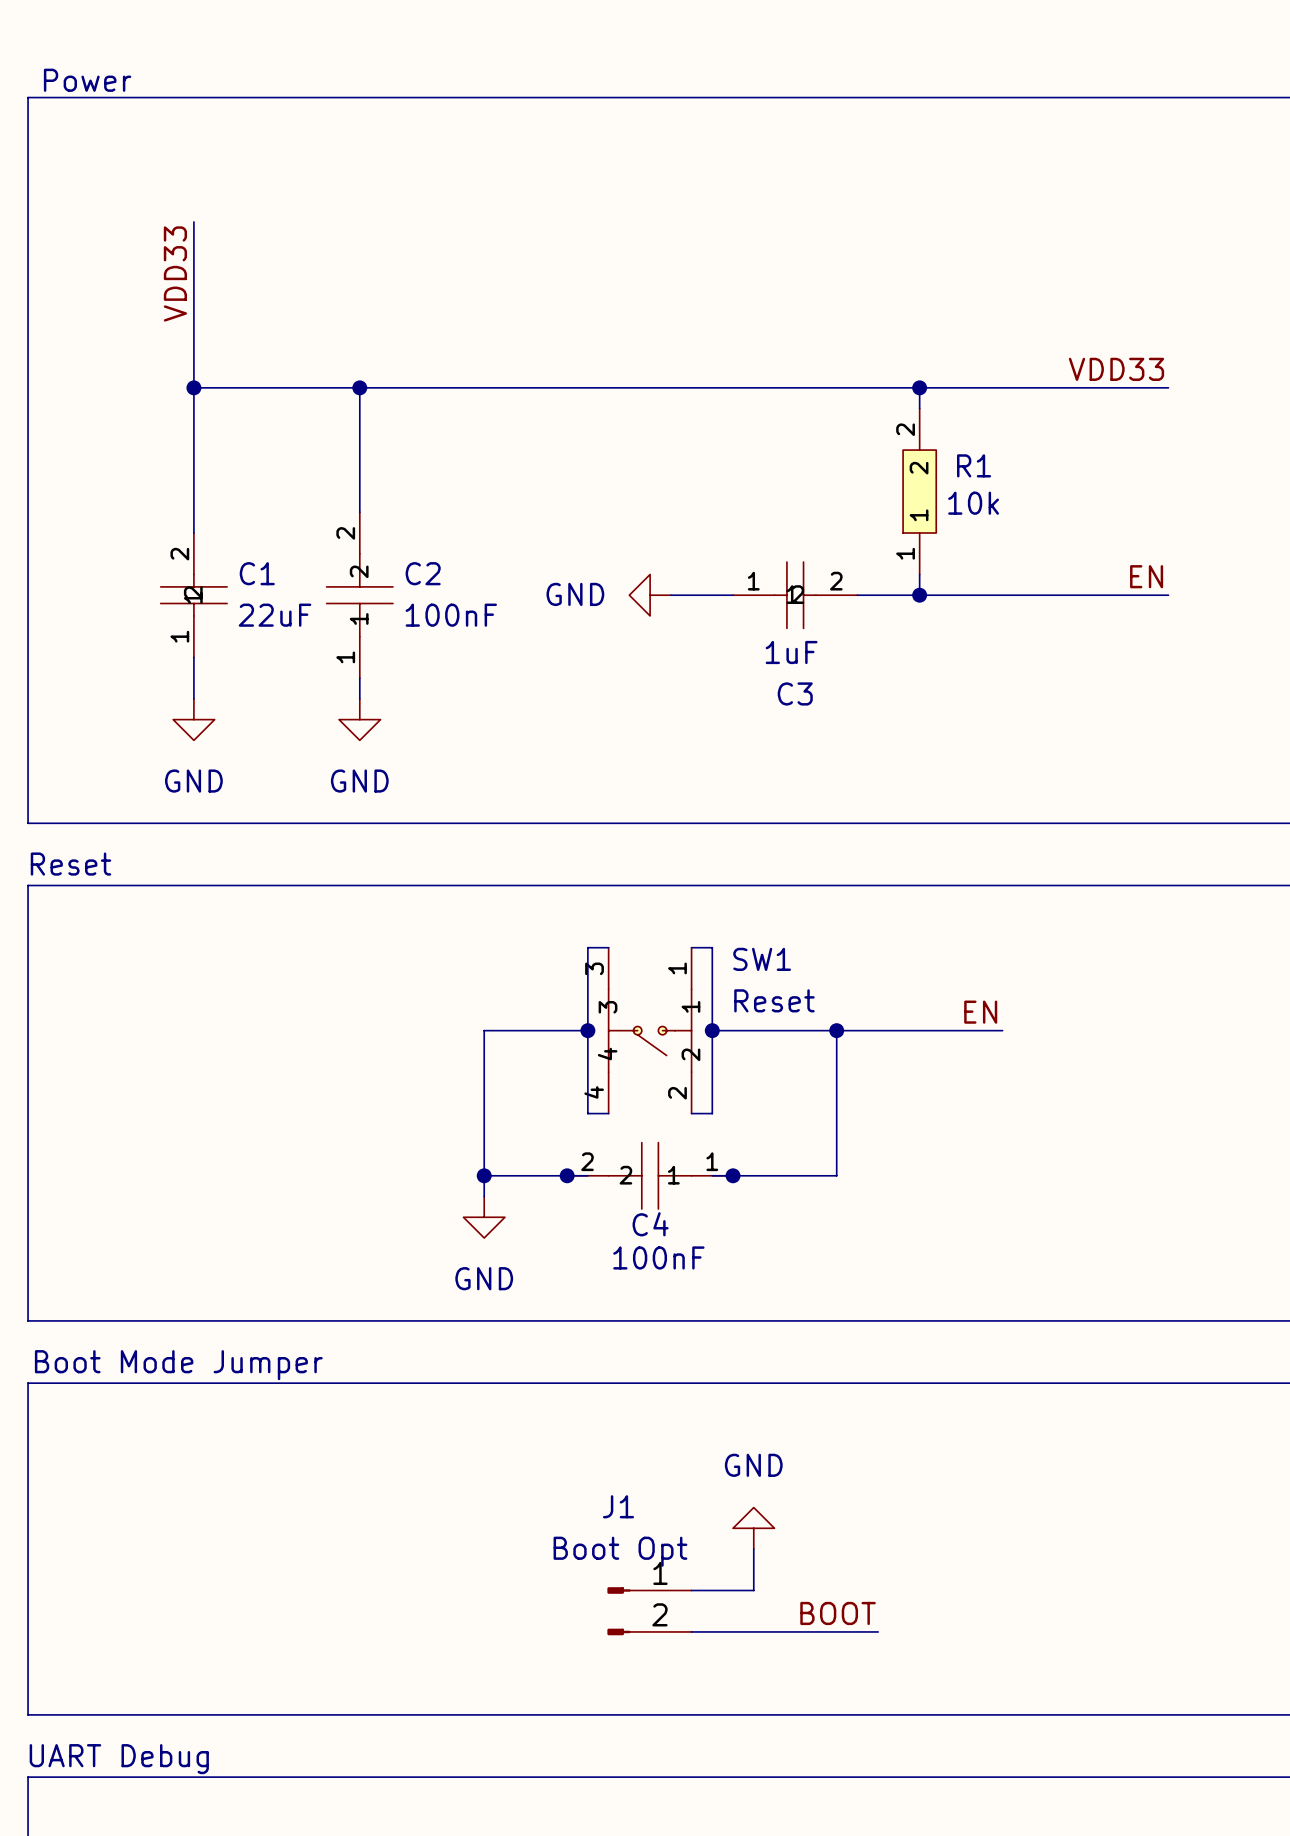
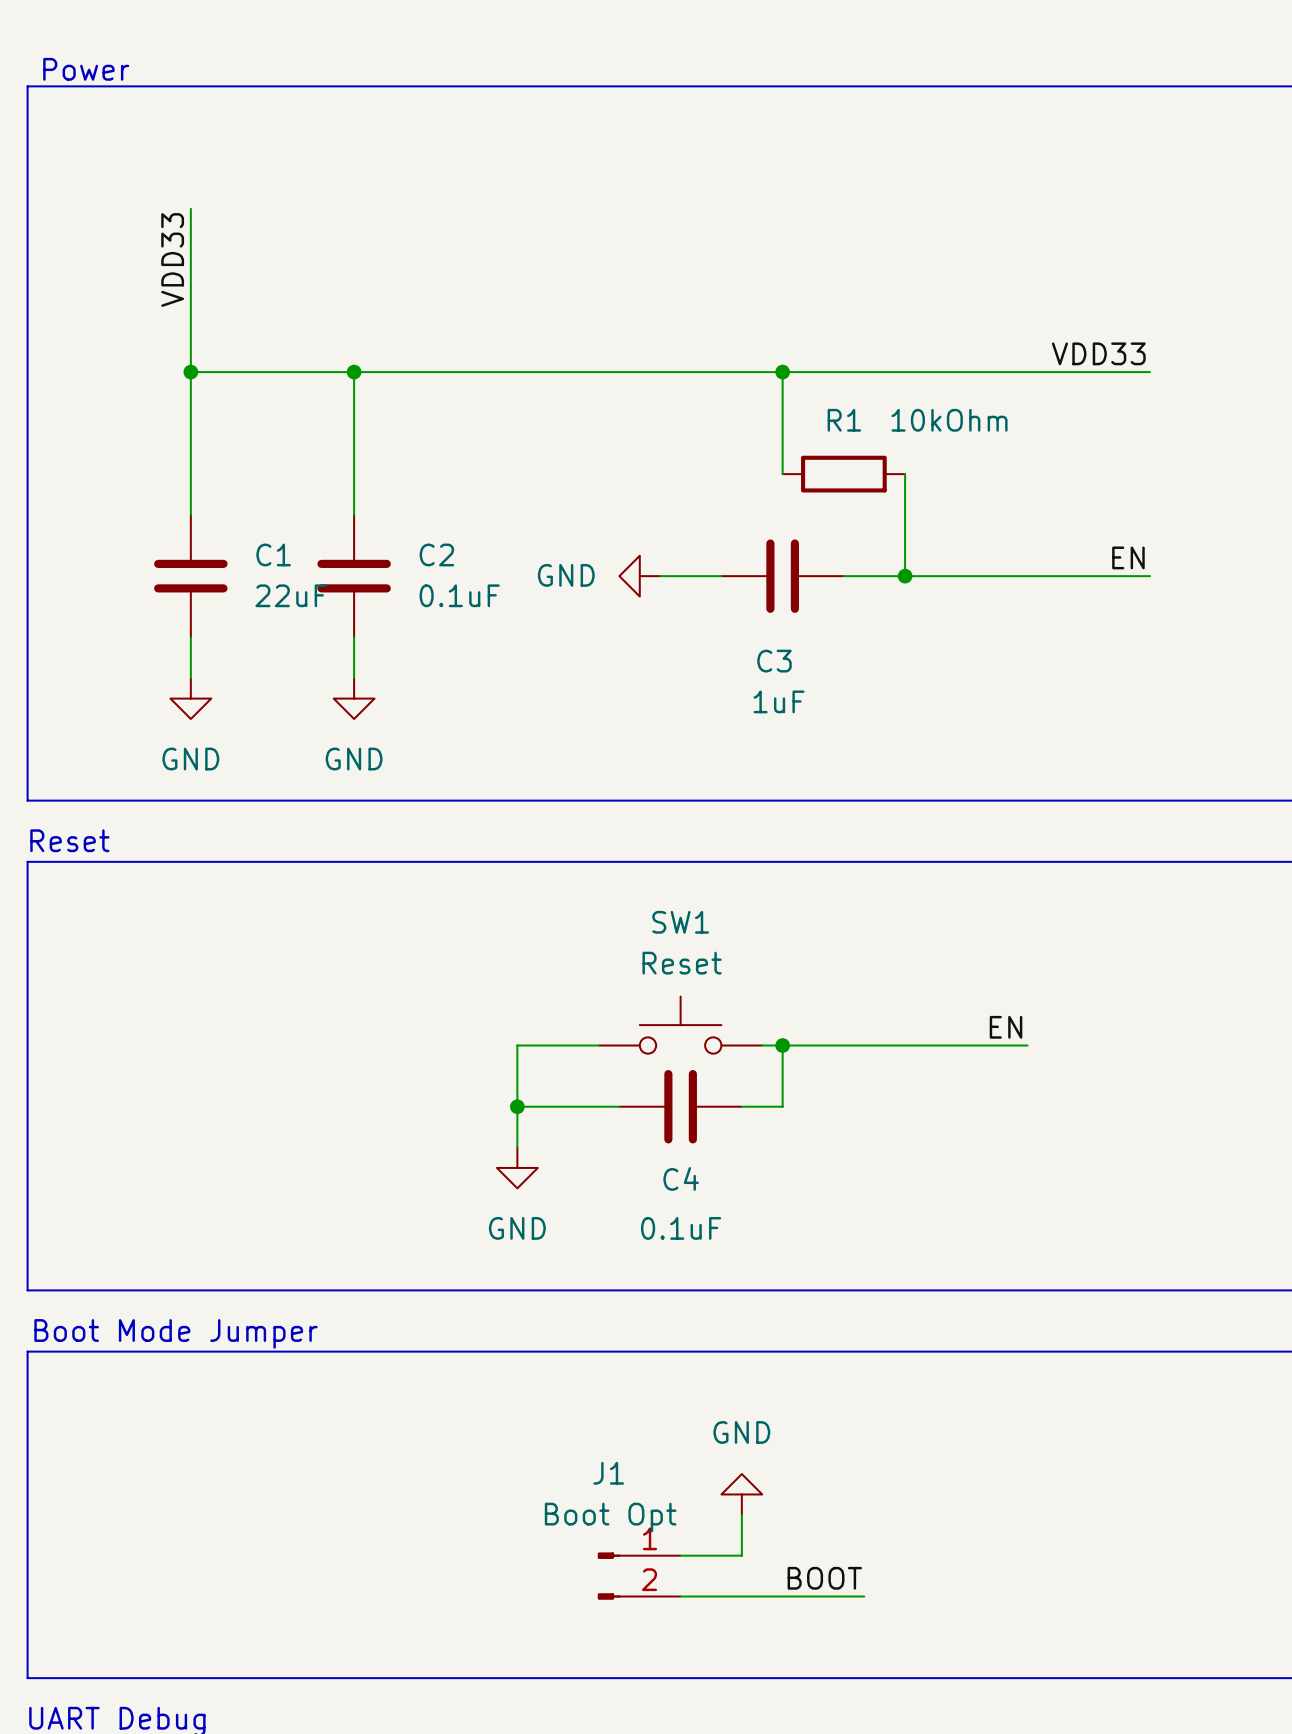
wire: none -> (782, 372) (782, 474)
junction: none -> (782, 372)
wire: (919, 387) (919, 408) -> none
junction: (919, 387) -> none
R1 symbol: [903, 408, 937, 575] -> [782, 455, 906, 493]
R1 name position: R1 (974, 465) -> R1 (844, 420)
R1 value: 10k (973, 503) -> 10kOhm (949, 420)
C2 symbol: [326, 512, 393, 679] -> [317, 514, 391, 638]
C1 symbol: [160, 533, 228, 658] -> [154, 514, 228, 638]
C3 symbol: [733, 562, 858, 629] -> [721, 539, 844, 613]
C2 value: 100nF (451, 615) -> 0.1uF (459, 595)
C3 value position: 1uF (791, 652) -> 1uF (779, 701)
wire: (608, 947) (587, 947) (587, 1113) (608, 1113) -> none
SW1 symbol: [608, 947, 692, 1114] -> [598, 996, 763, 1054]
wire: (691, 947) (712, 947) (712, 1113) (691, 1113) -> none
SW1 name position: SW1 (762, 959) -> SW1 (680, 922)
SW1 value position: Reset (774, 1000) -> Reset (682, 963)
label position: EN (980, 1012) -> EN (1006, 1027)
wire: (587, 1030) (484, 1030) (484, 1196) -> none
junction: (587, 1030) -> none
wire: (712, 1030) (1002, 1030) -> none
junction: (712, 1030) -> none
wire: (836, 1030) (836, 1175) (712, 1175) -> none
junction: (836, 1030) -> none
wire: none -> (598, 1045) (517, 1045) (517, 1147)
wire: none -> (762, 1045) (1027, 1045)
wire: none -> (782, 1045) (782, 1106) (741, 1106)
junction: none -> (782, 1045)
junction: none -> (517, 1106)
C4 symbol: [567, 1142, 734, 1209] -> [619, 1070, 742, 1144]
wire: (484, 1175) (587, 1175) -> (517, 1106) (619, 1106)
junction: (484, 1175) -> none
junction: (567, 1175) -> none
junction: (733, 1175) -> none
power symbol position: GND (484, 1217) -> GND (517, 1167)
C4 value: 100nF (658, 1257) -> 0.1uF (681, 1228)

